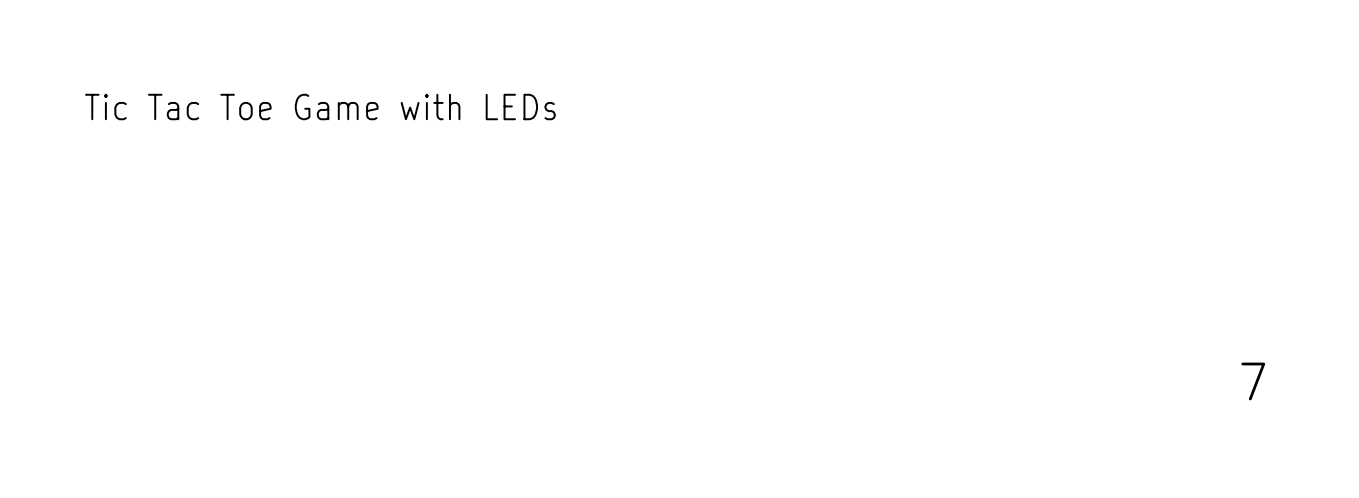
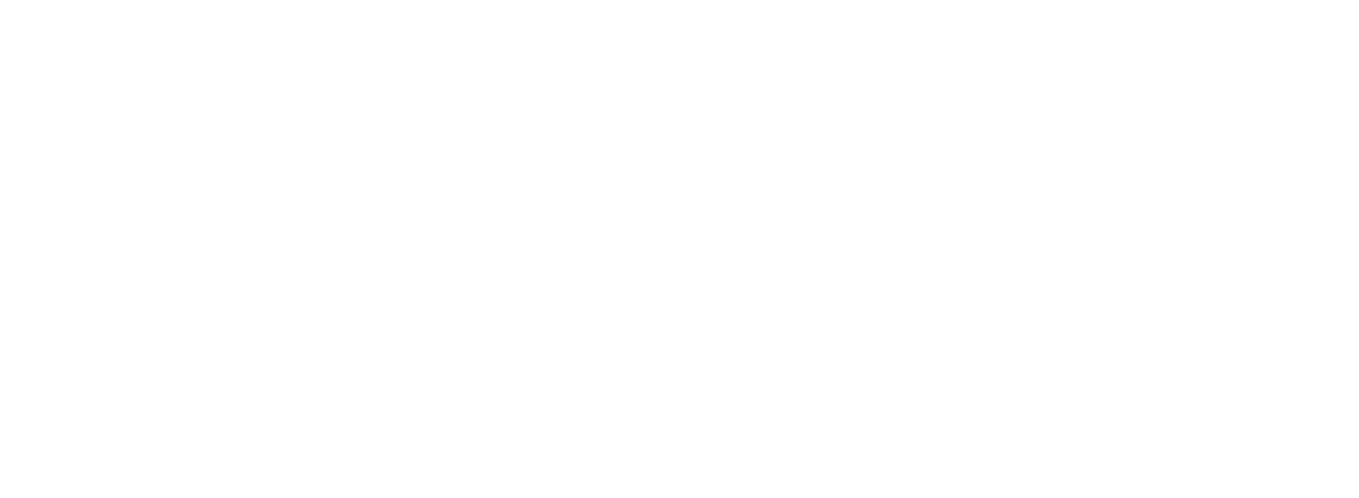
text: Tic Tac Toe Game with LEDs (320, 107) -> none
text: 7 (1253, 381) -> none

